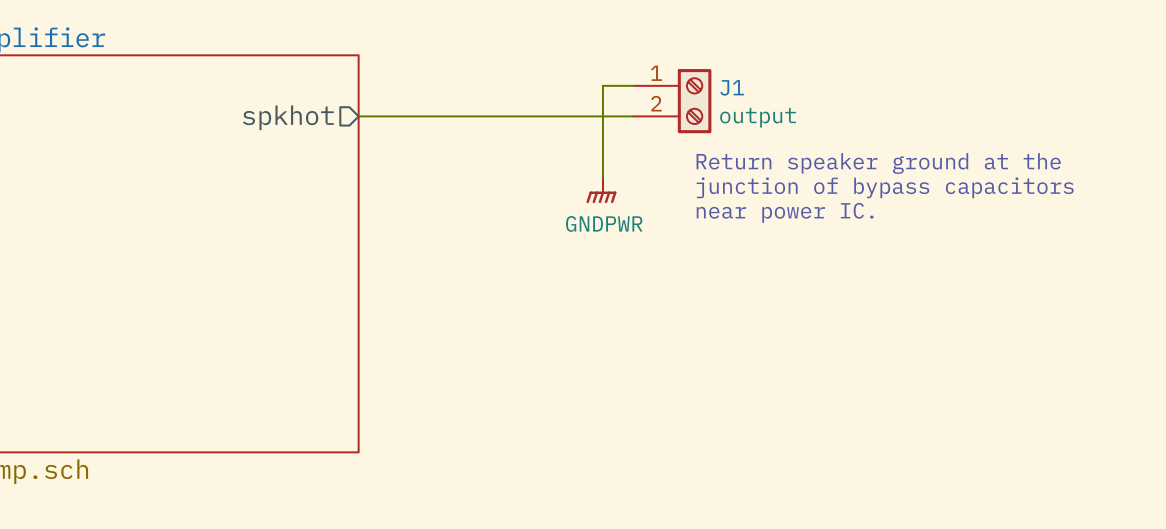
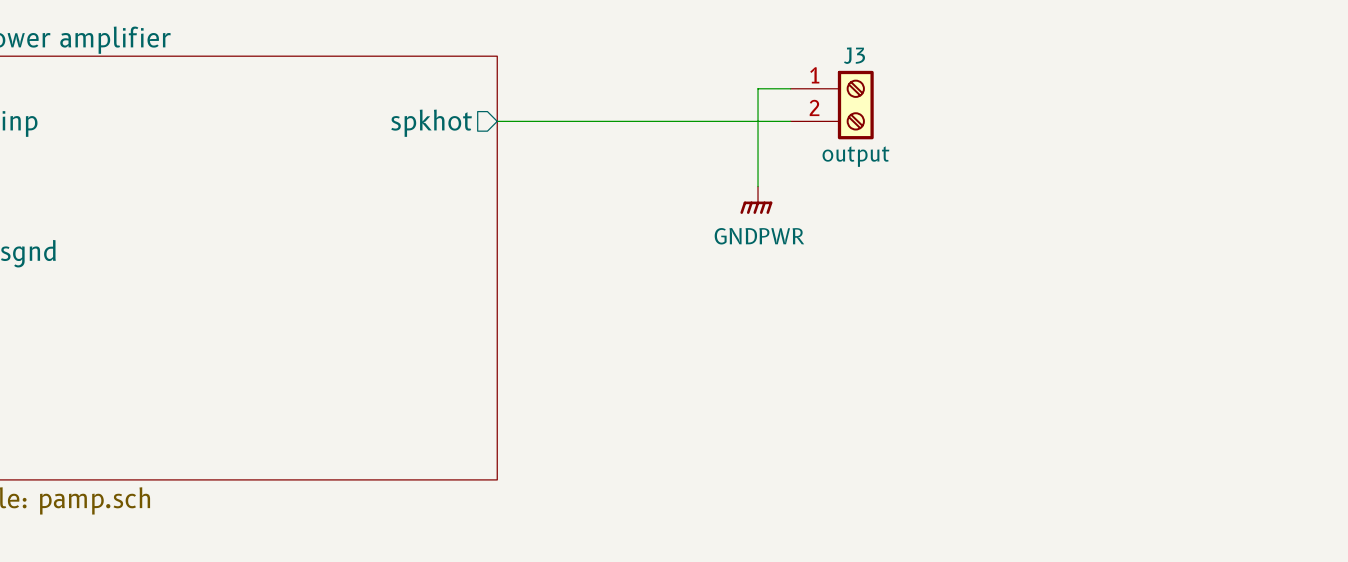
J1 name: J1 (732, 87) -> J3 (854, 55)
J1 value position: output (758, 117) -> output (855, 156)
text: Return speaker ground at the (878, 163) -> none
text: junction of bypass capacitors (885, 187) -> none
text: near power IC. (785, 212) -> none

